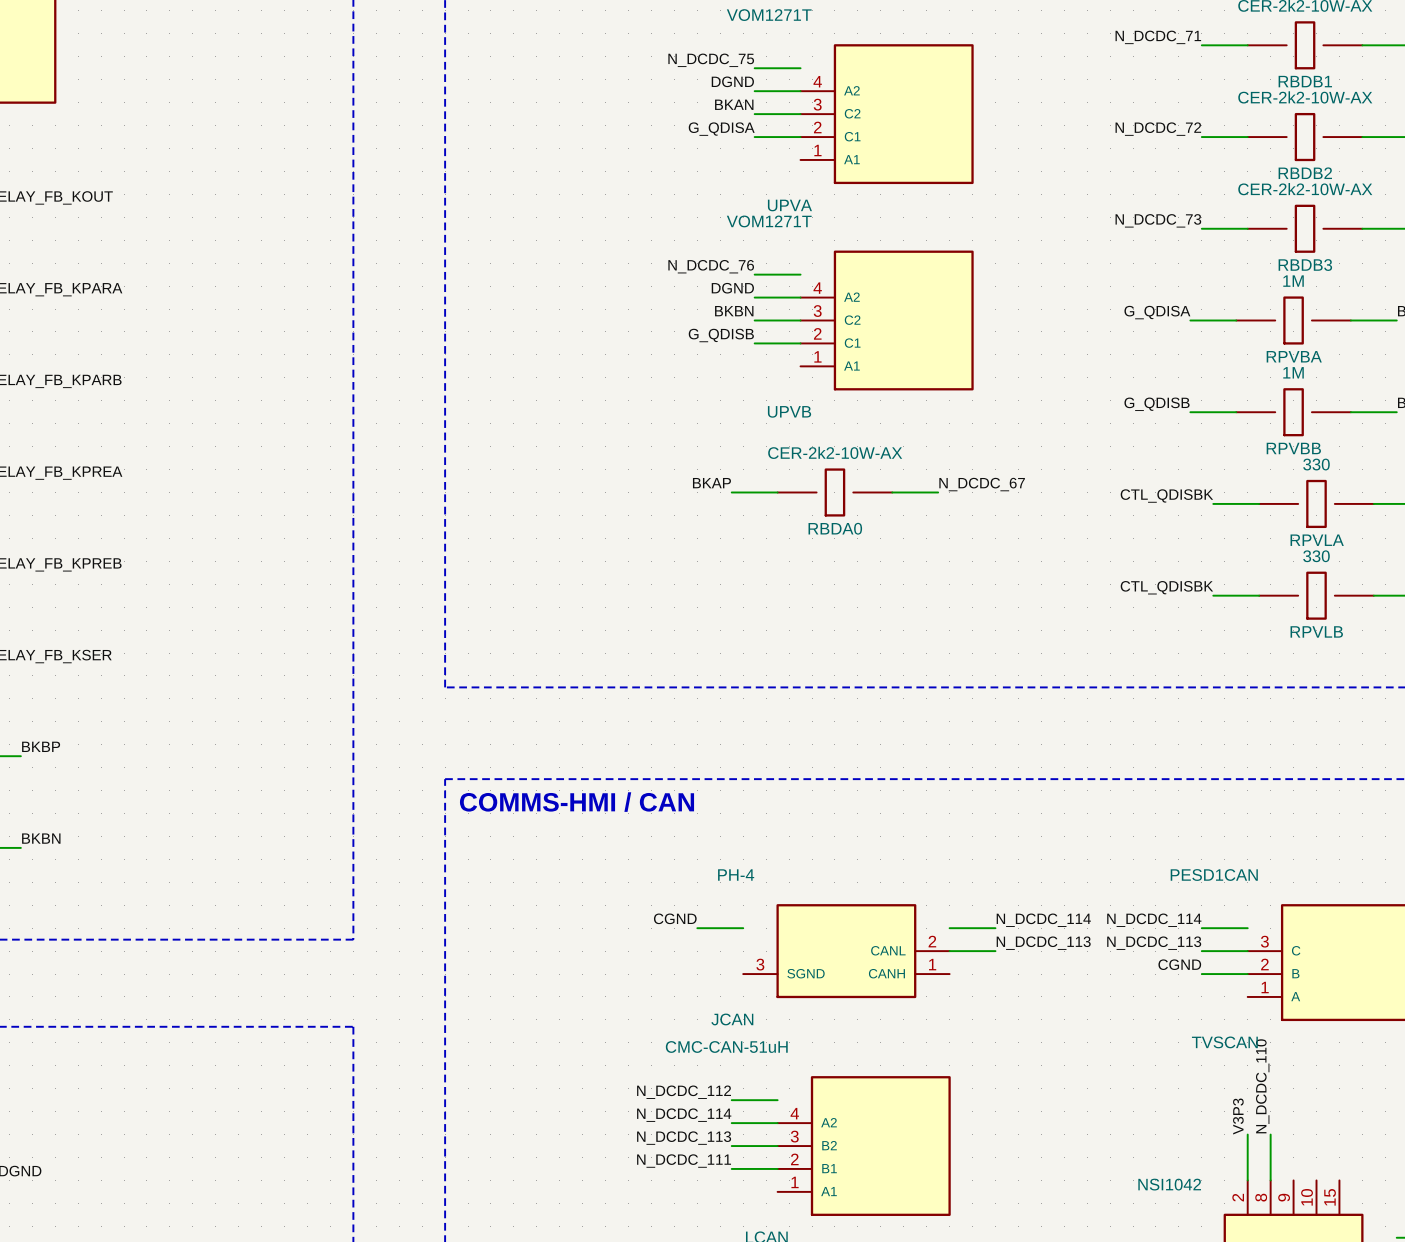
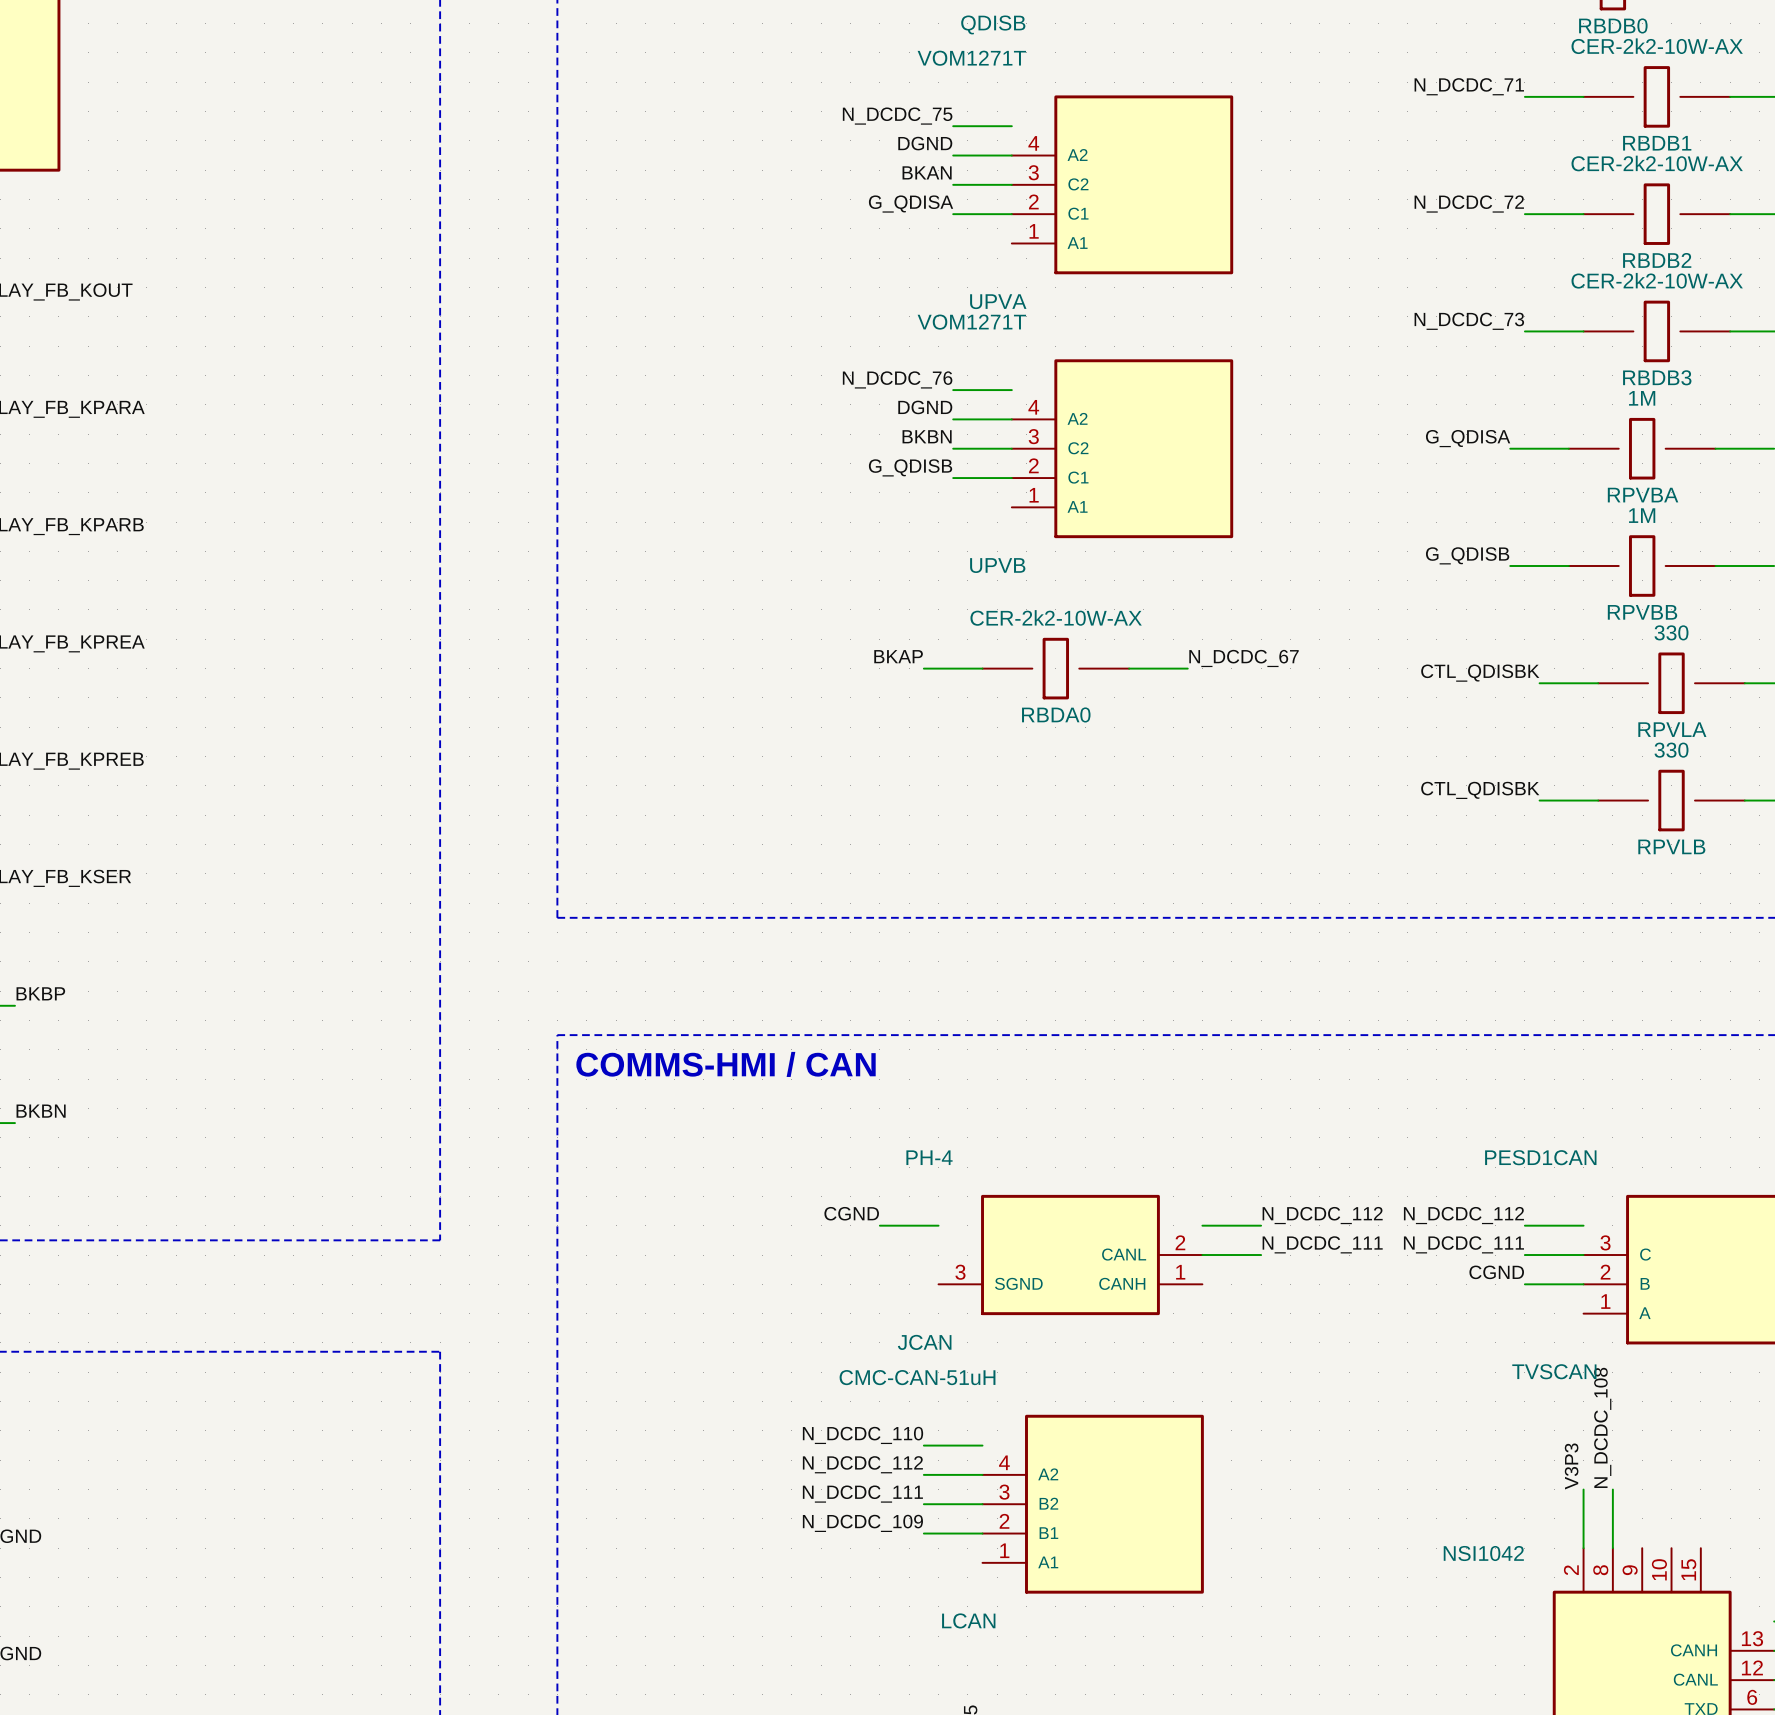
label: N_DCDC_114 (1043, 920) -> N_DCDC_112 (1322, 1215)
label: N_DCDC_114 (1154, 920) -> N_DCDC_112 (1463, 1215)
label: N_DCDC_113 (1043, 943) -> N_DCDC_111 (1322, 1244)
label: N_DCDC_113 (1154, 943) -> N_DCDC_111 (1463, 1244)
label: N_DCDC_110 (1262, 1086) -> N_DCDC_108 (1602, 1427)
label: N_DCDC_112 (684, 1092) -> N_DCDC_110 (862, 1435)
label: N_DCDC_114 (684, 1115) -> N_DCDC_112 (862, 1464)
label: N_DCDC_113 (684, 1138) -> N_DCDC_111 (862, 1494)
label: N_DCDC_111 (684, 1161) -> N_DCDC_109 (862, 1523)

